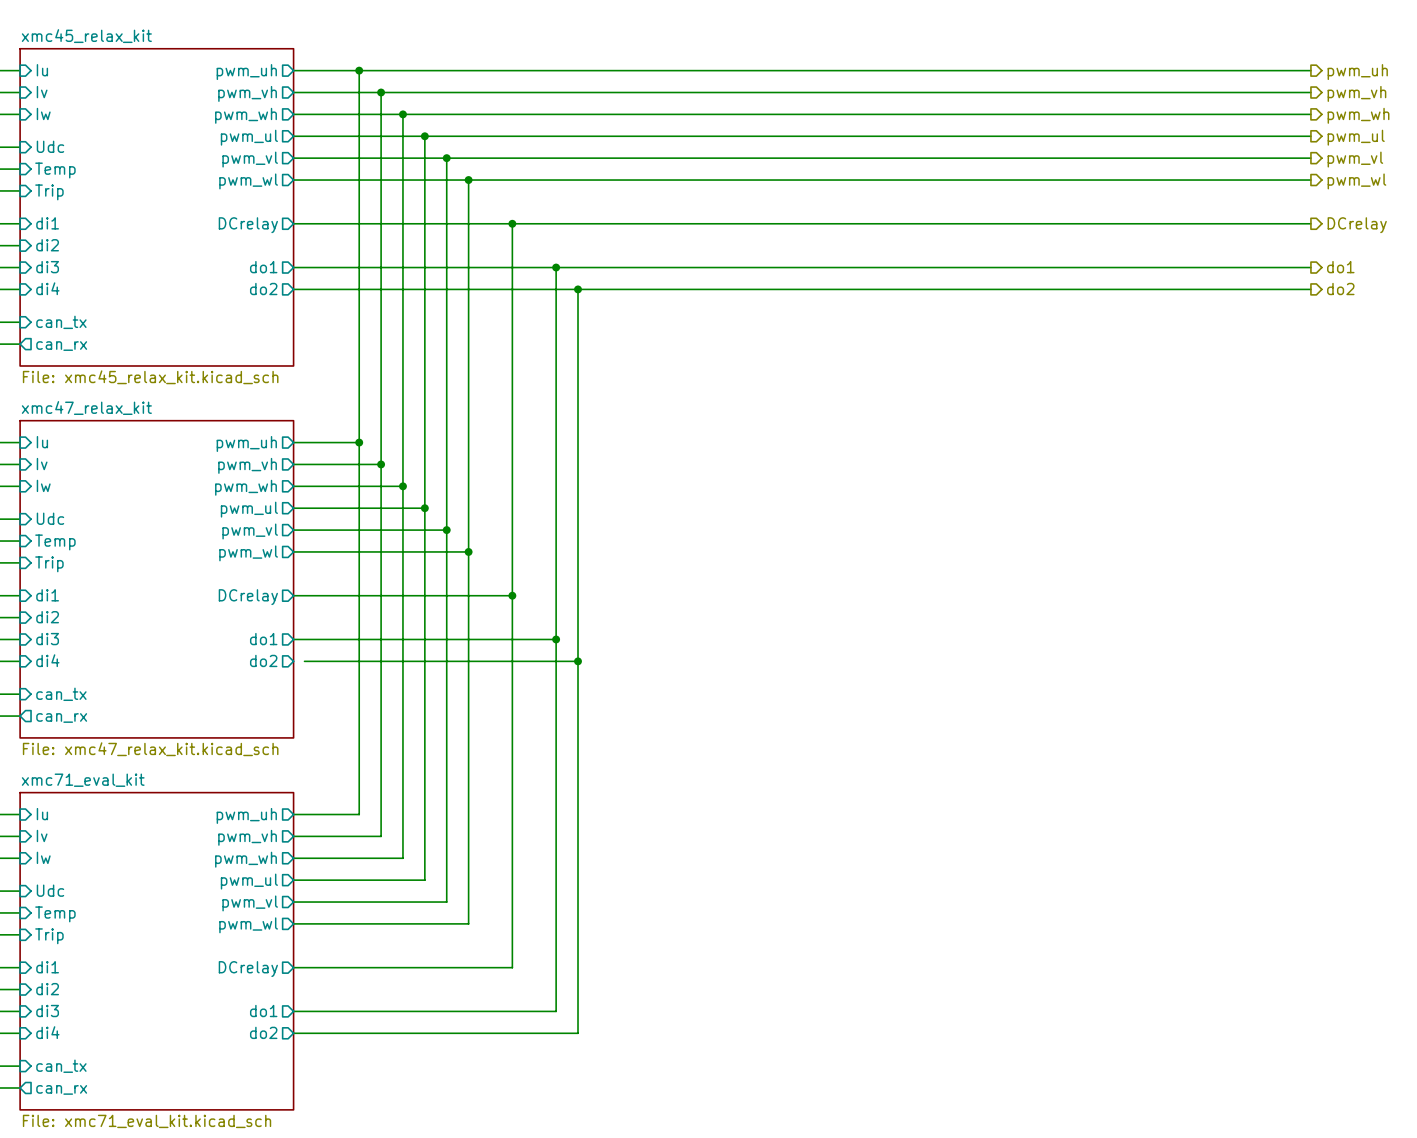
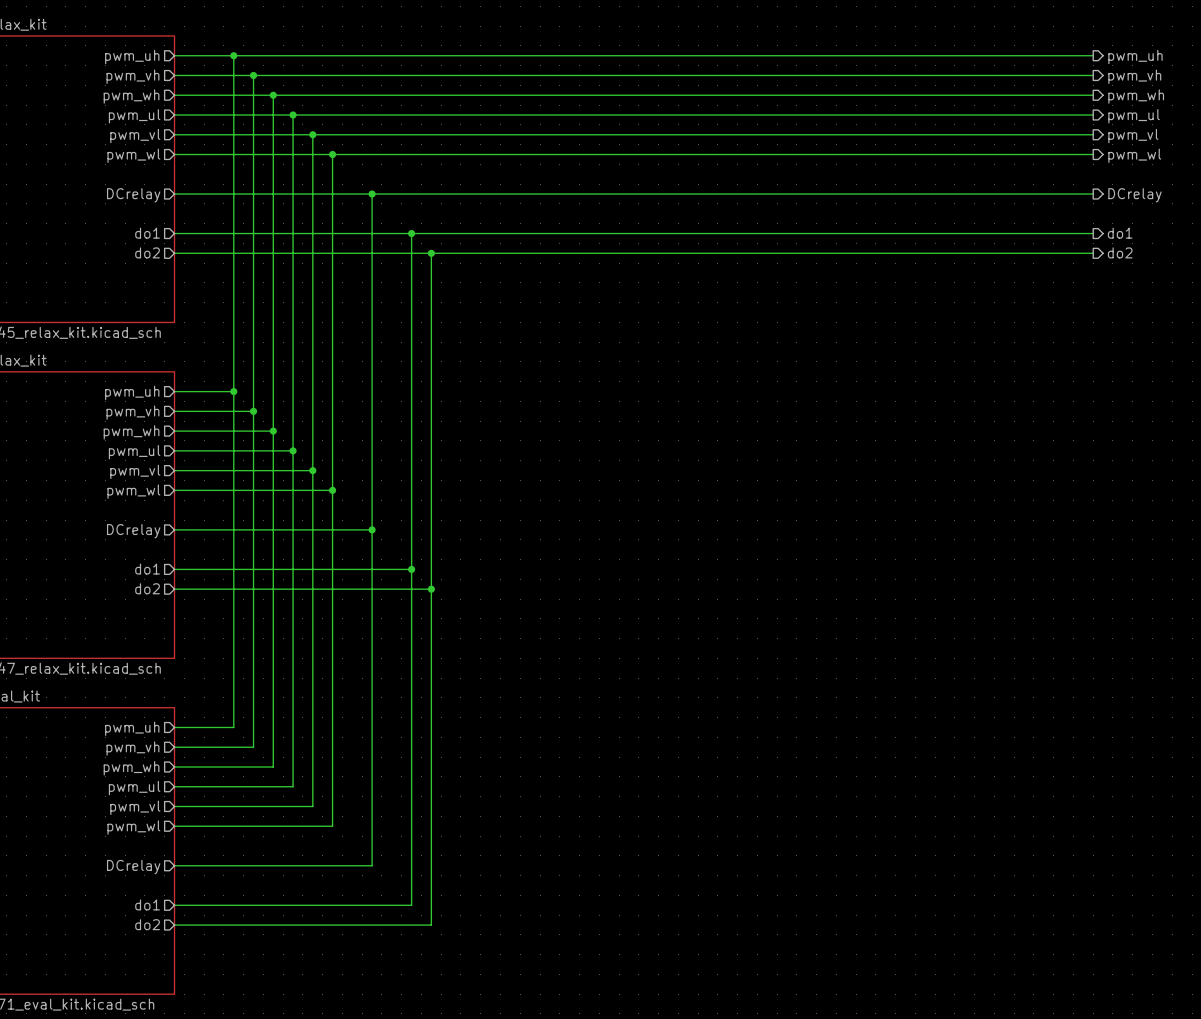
wire: none -> (174, 589) (184, 589)

